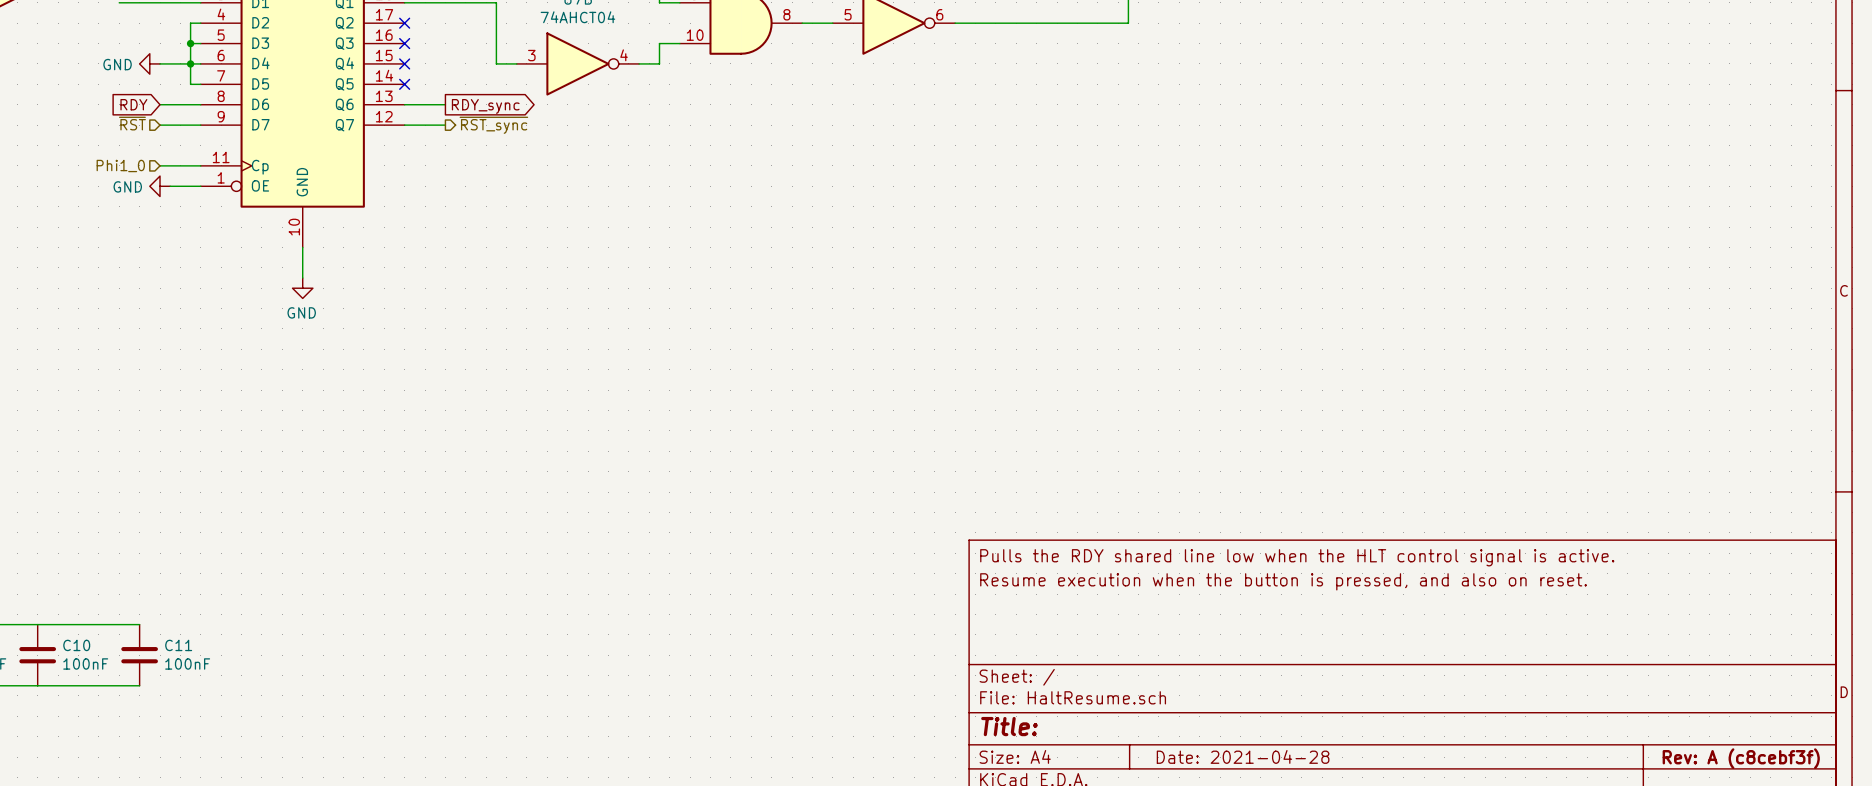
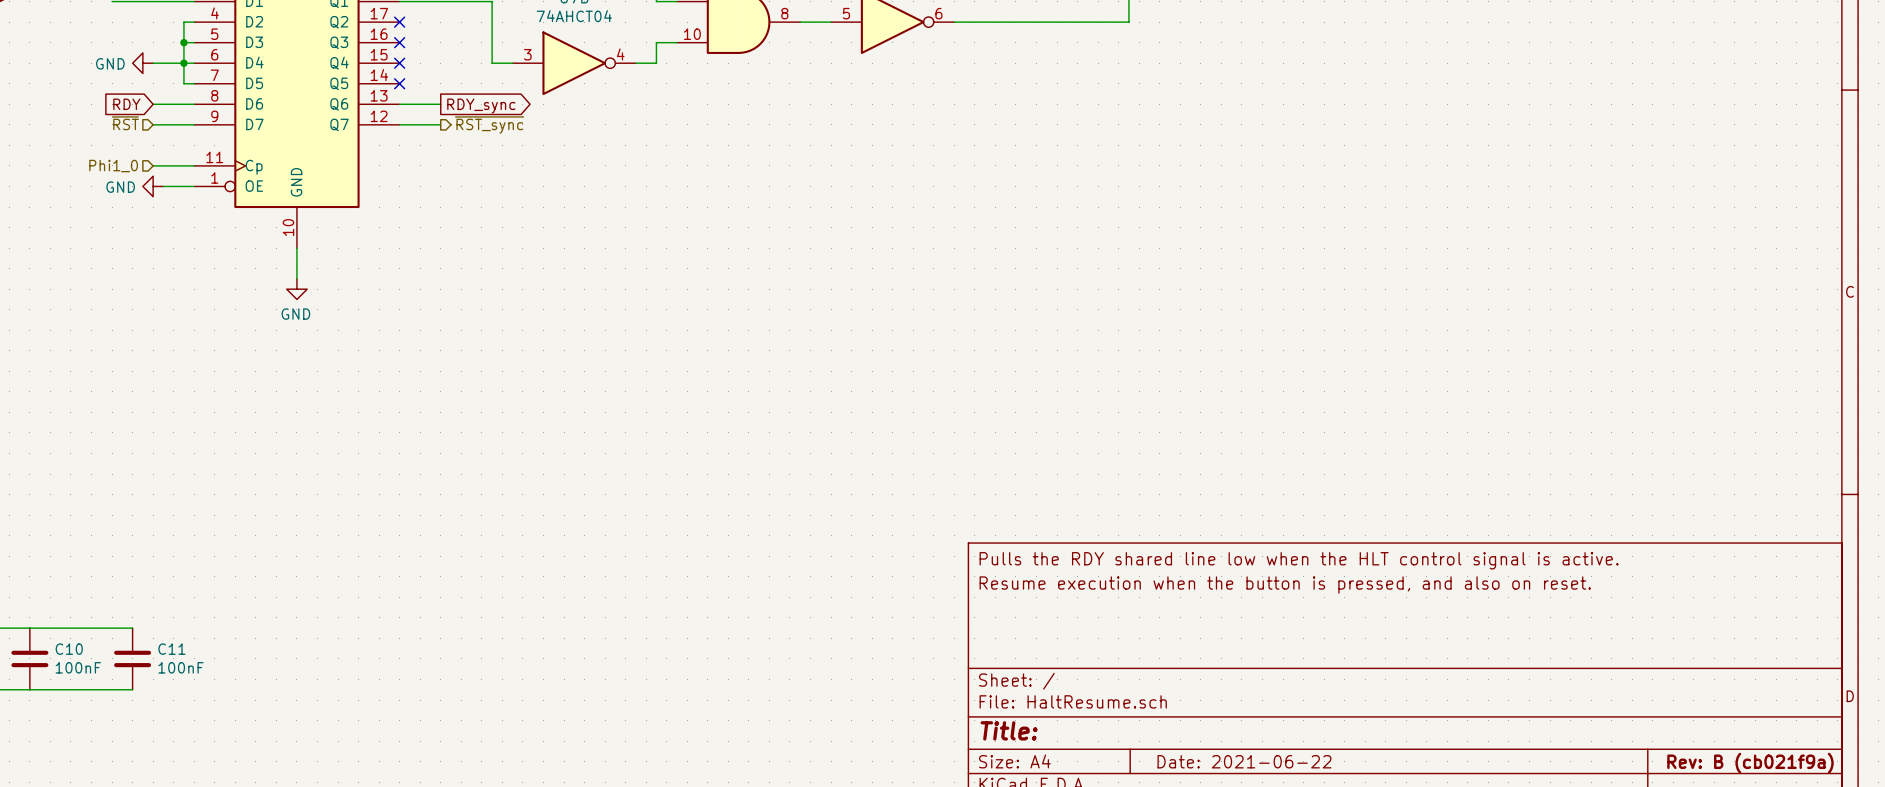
title block: Date: 2021-04-28 (1243, 756) -> Date: 2021-06-22 (1244, 761)
title block: Rev: A (c8cebf3f) (1741, 758) -> Rev: B (cb021f9a) (1750, 763)

